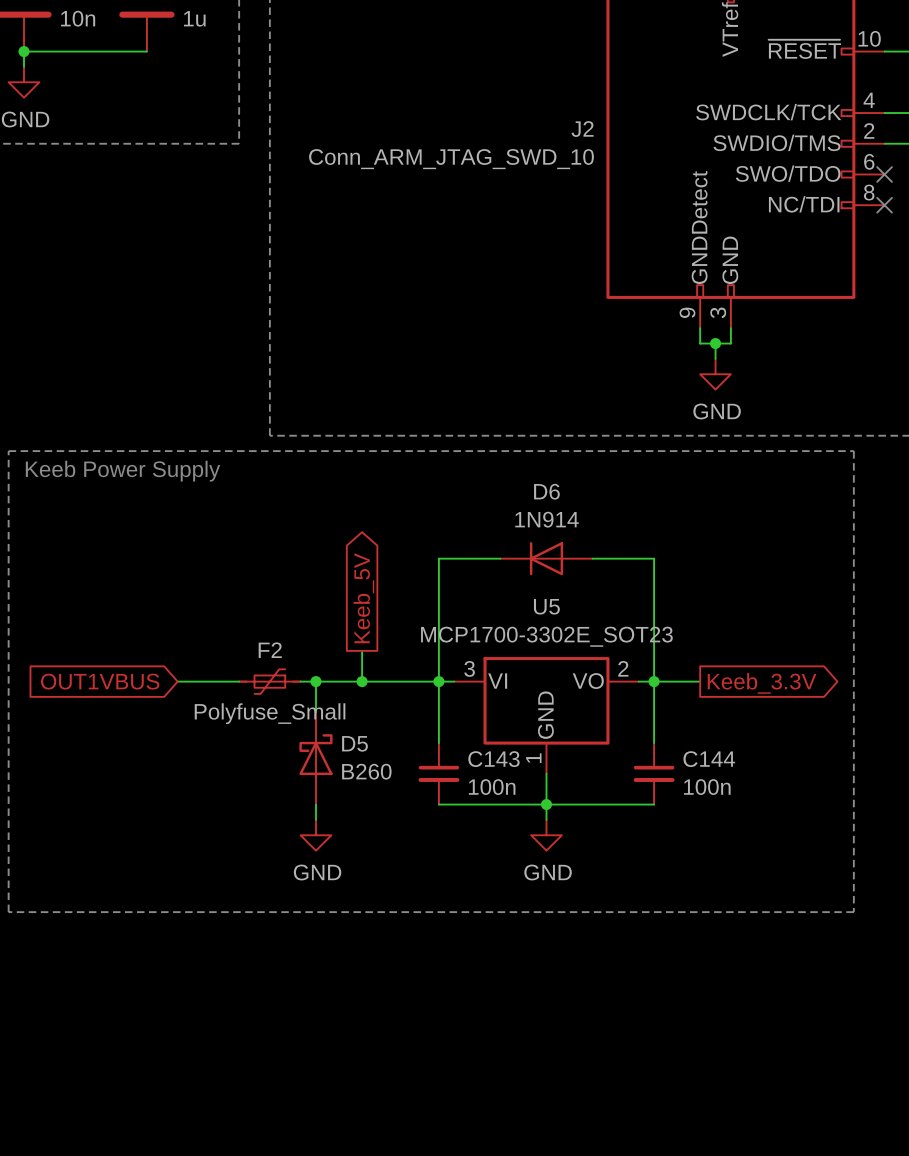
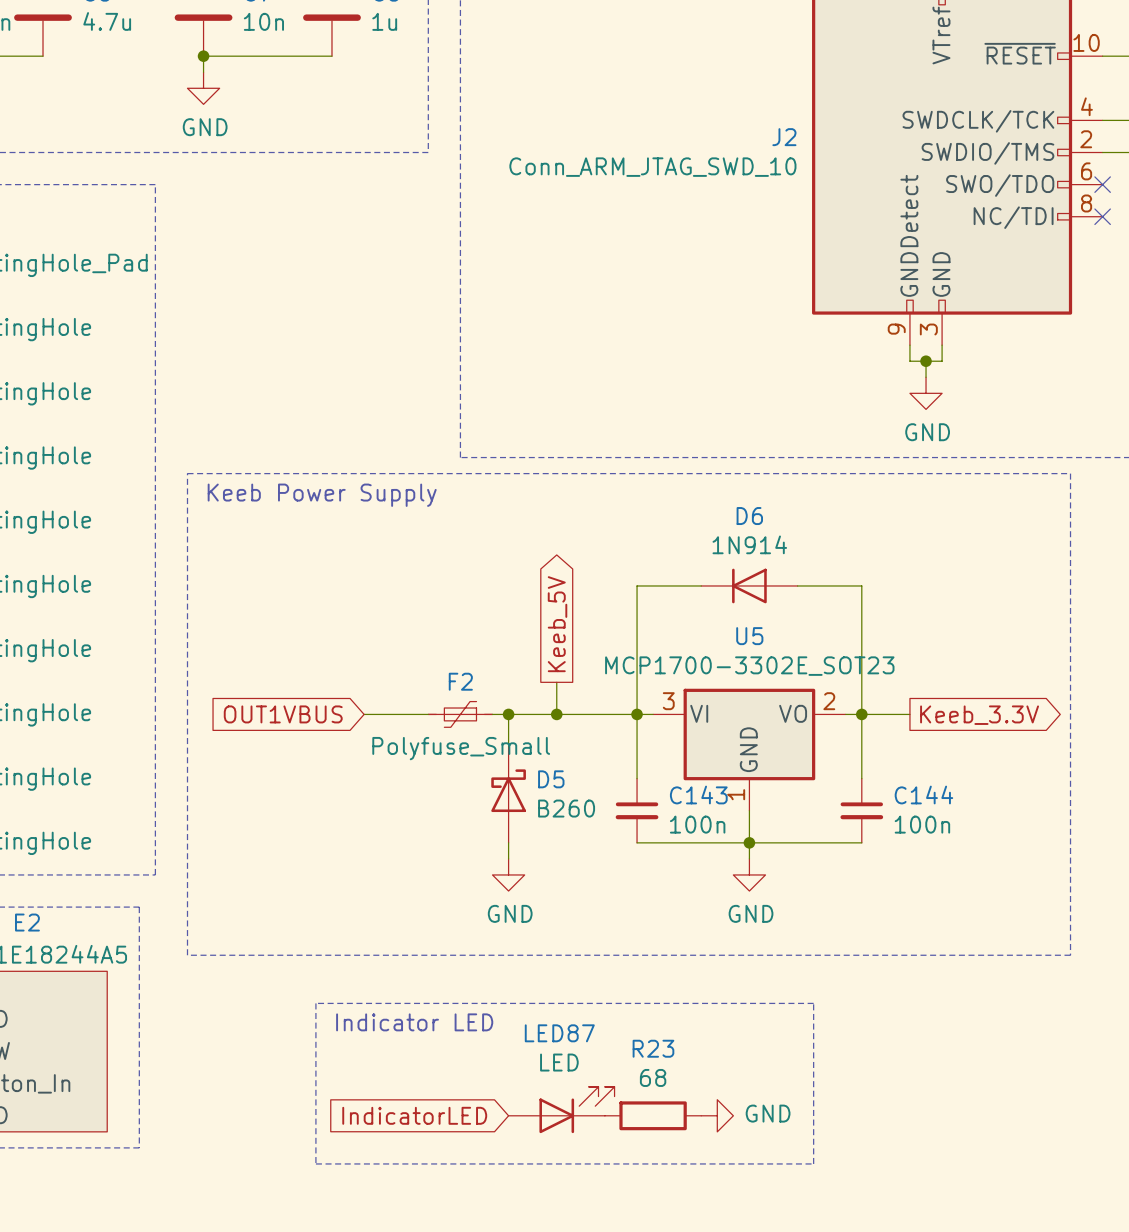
line: none -> (315, 1003) (315, 1163) (813, 1163) (813, 1003) (315, 1003)
text: none -> Indicator LED (414, 1022)
LED87: none -> LED (561, 1110)
global label: none -> IndicatorLED (414, 1115)
R23: none -> 68 (653, 1115)
power symbol: none -> GND (717, 1115)

